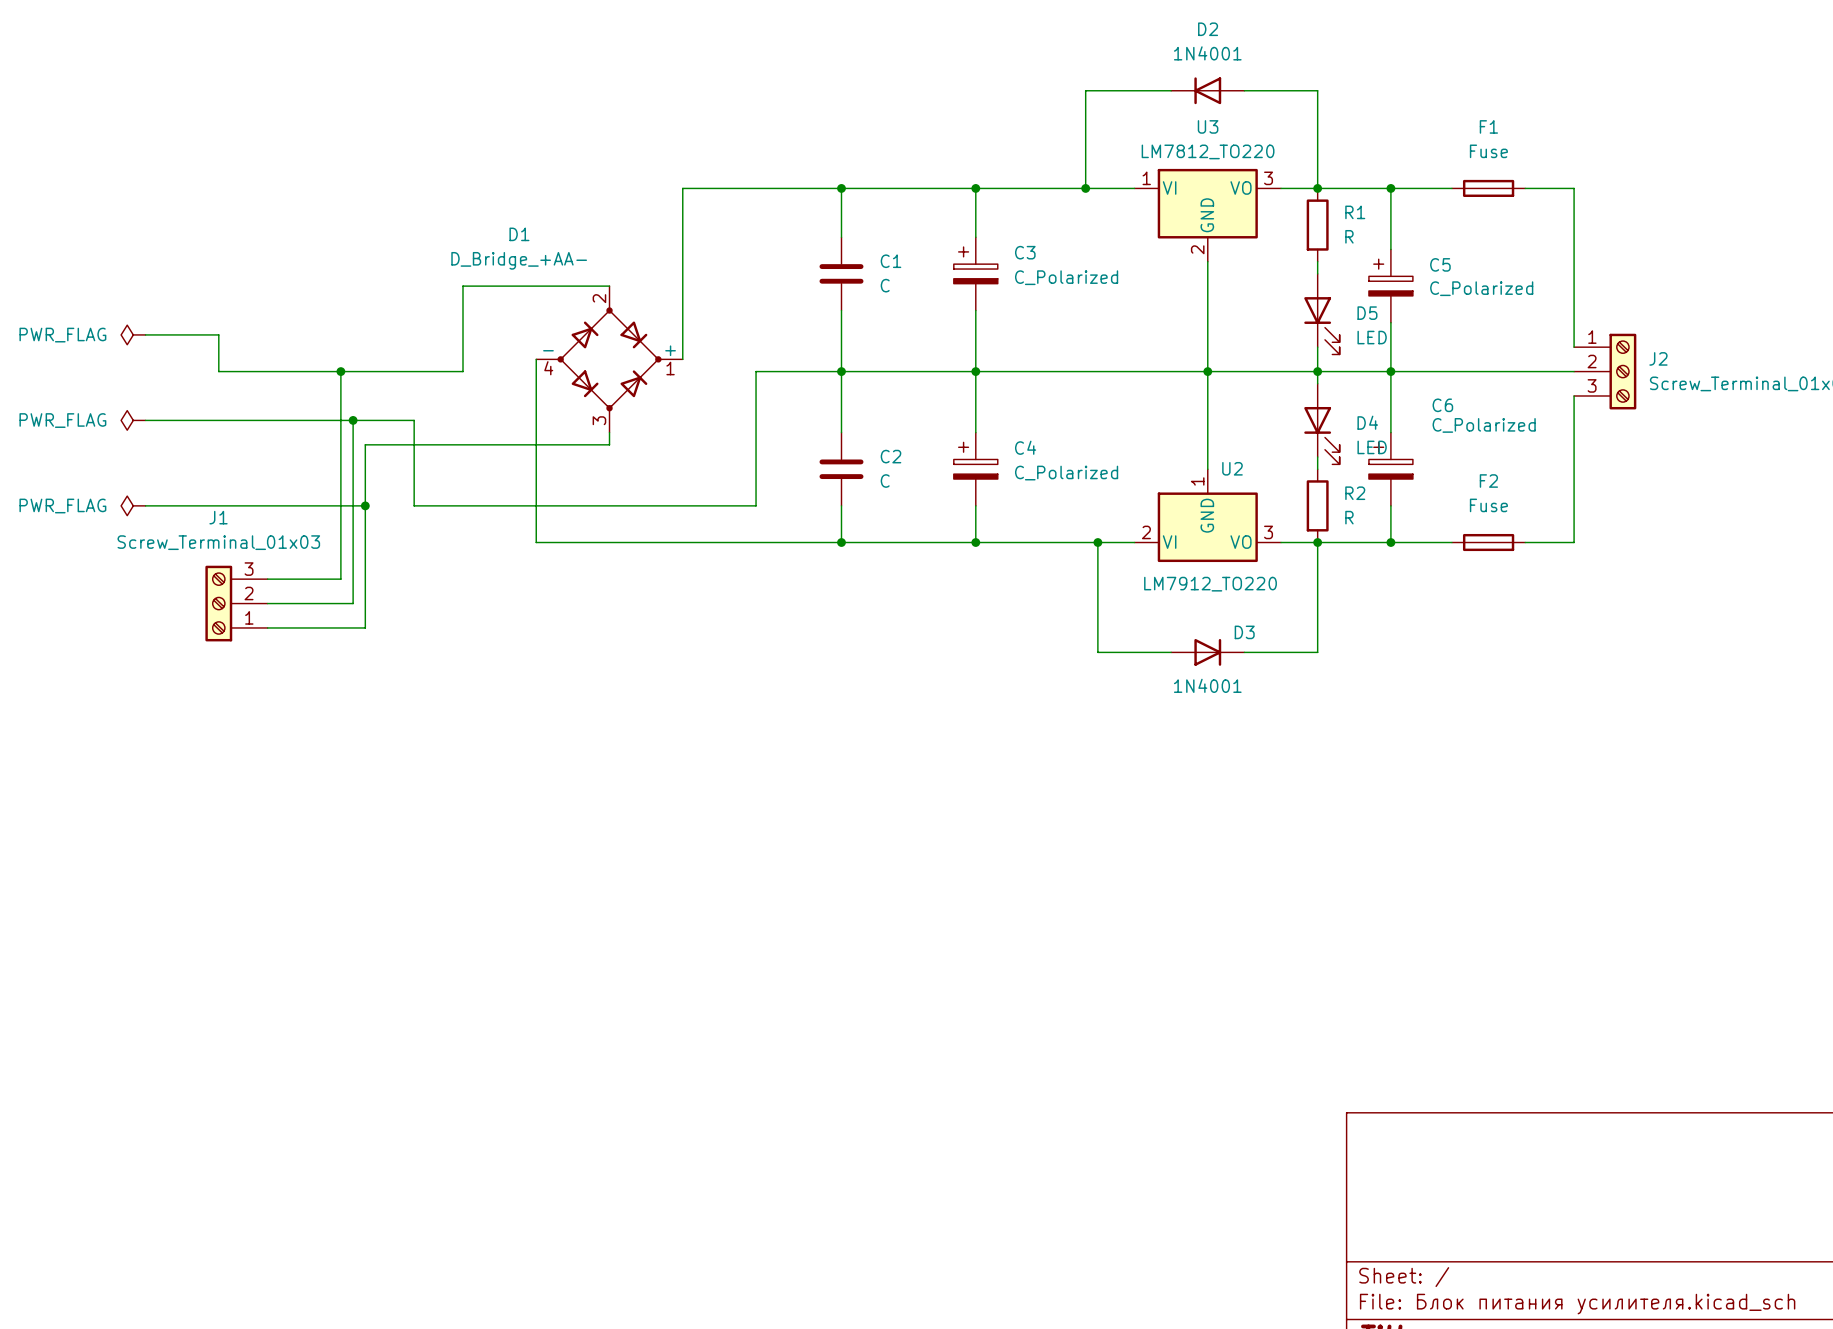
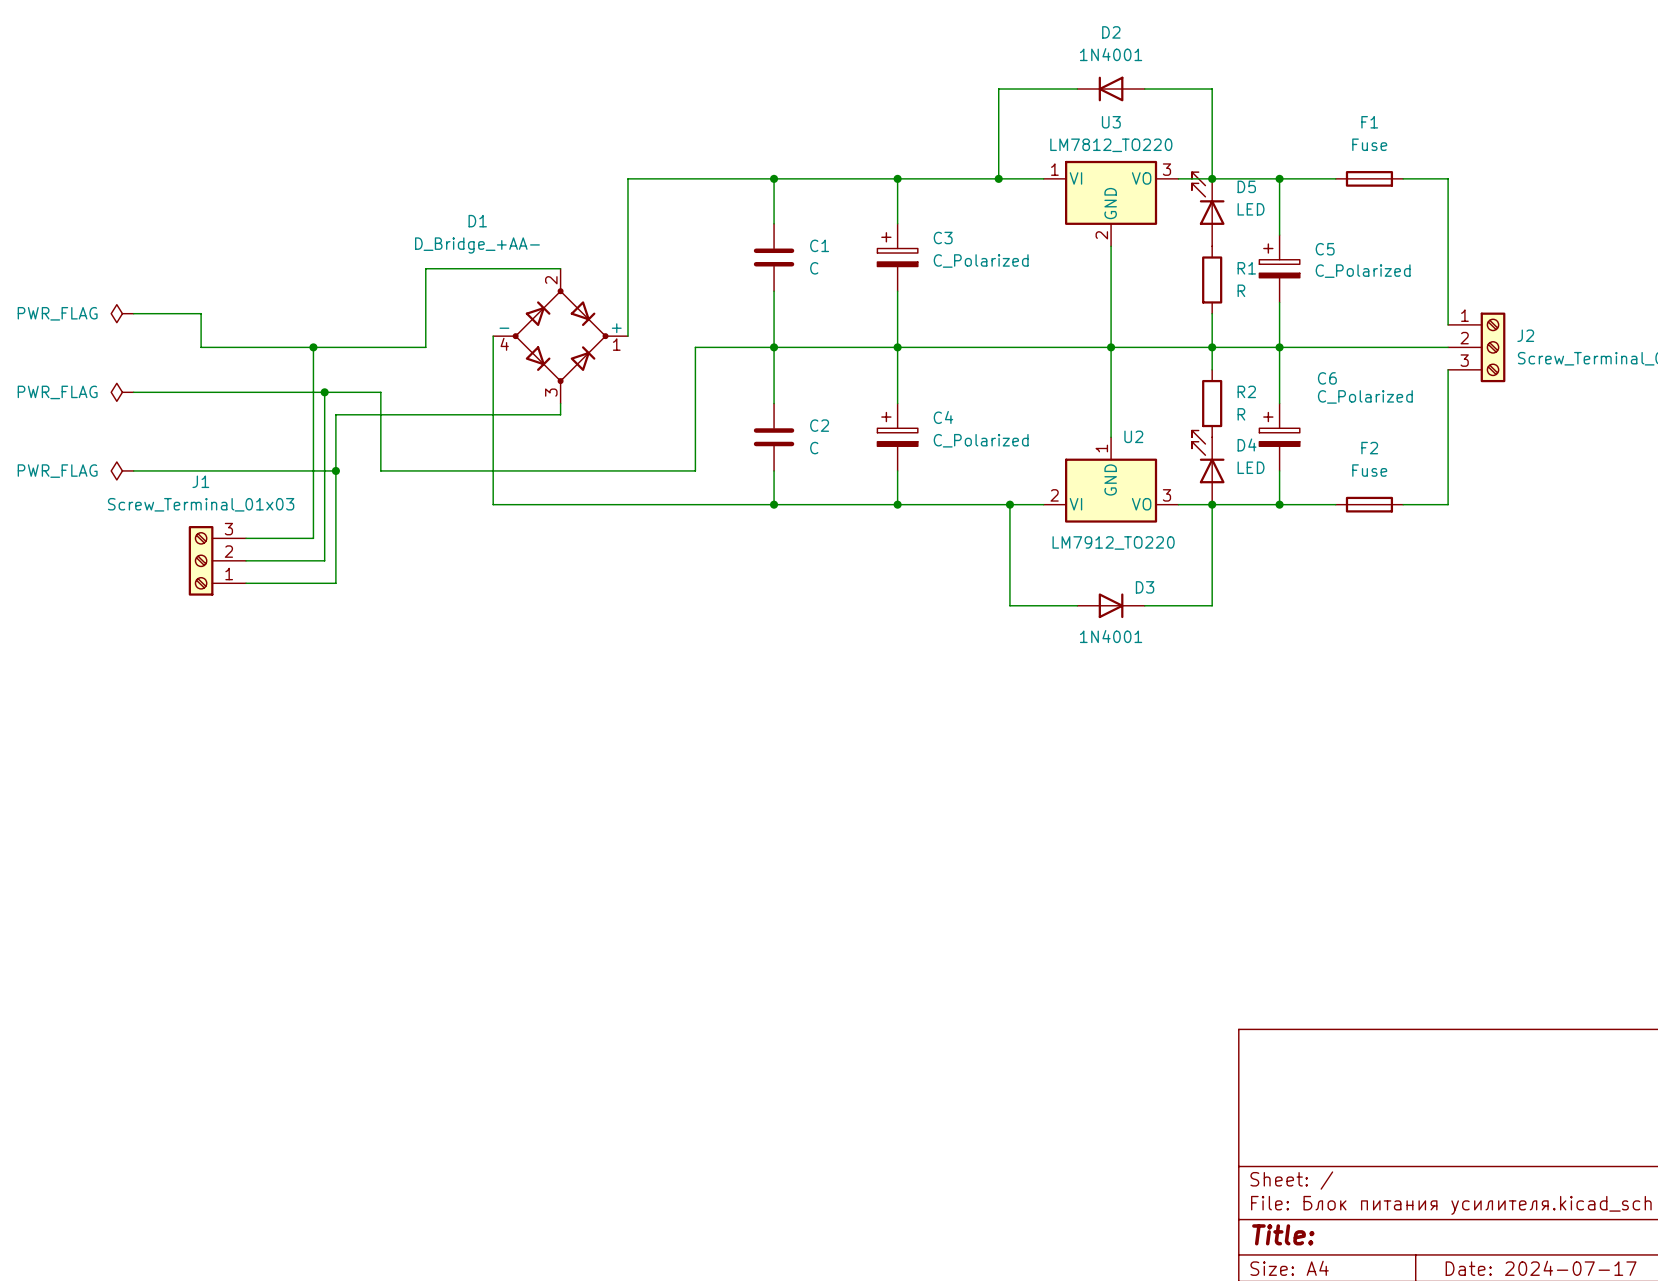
R1 position: (1317, 225) -> (1212, 279)
D5 name position: D5 (1367, 313) -> D5 (1246, 186)
D5 position: (1321, 314) -> (1208, 209)
D5 rotation: 0° (1321, 325) -> 180° (1208, 198)
D5 value position: LED (1372, 337) -> LED (1251, 209)
D4 name position: D4 (1367, 422) -> D4 (1247, 444)
D4 position: (1321, 424) -> (1208, 467)
D4 rotation: 0° (1321, 435) -> 180° (1208, 456)
D4 value position: LED (1372, 447) -> LED (1251, 467)
R2 position: (1317, 505) -> (1212, 403)

